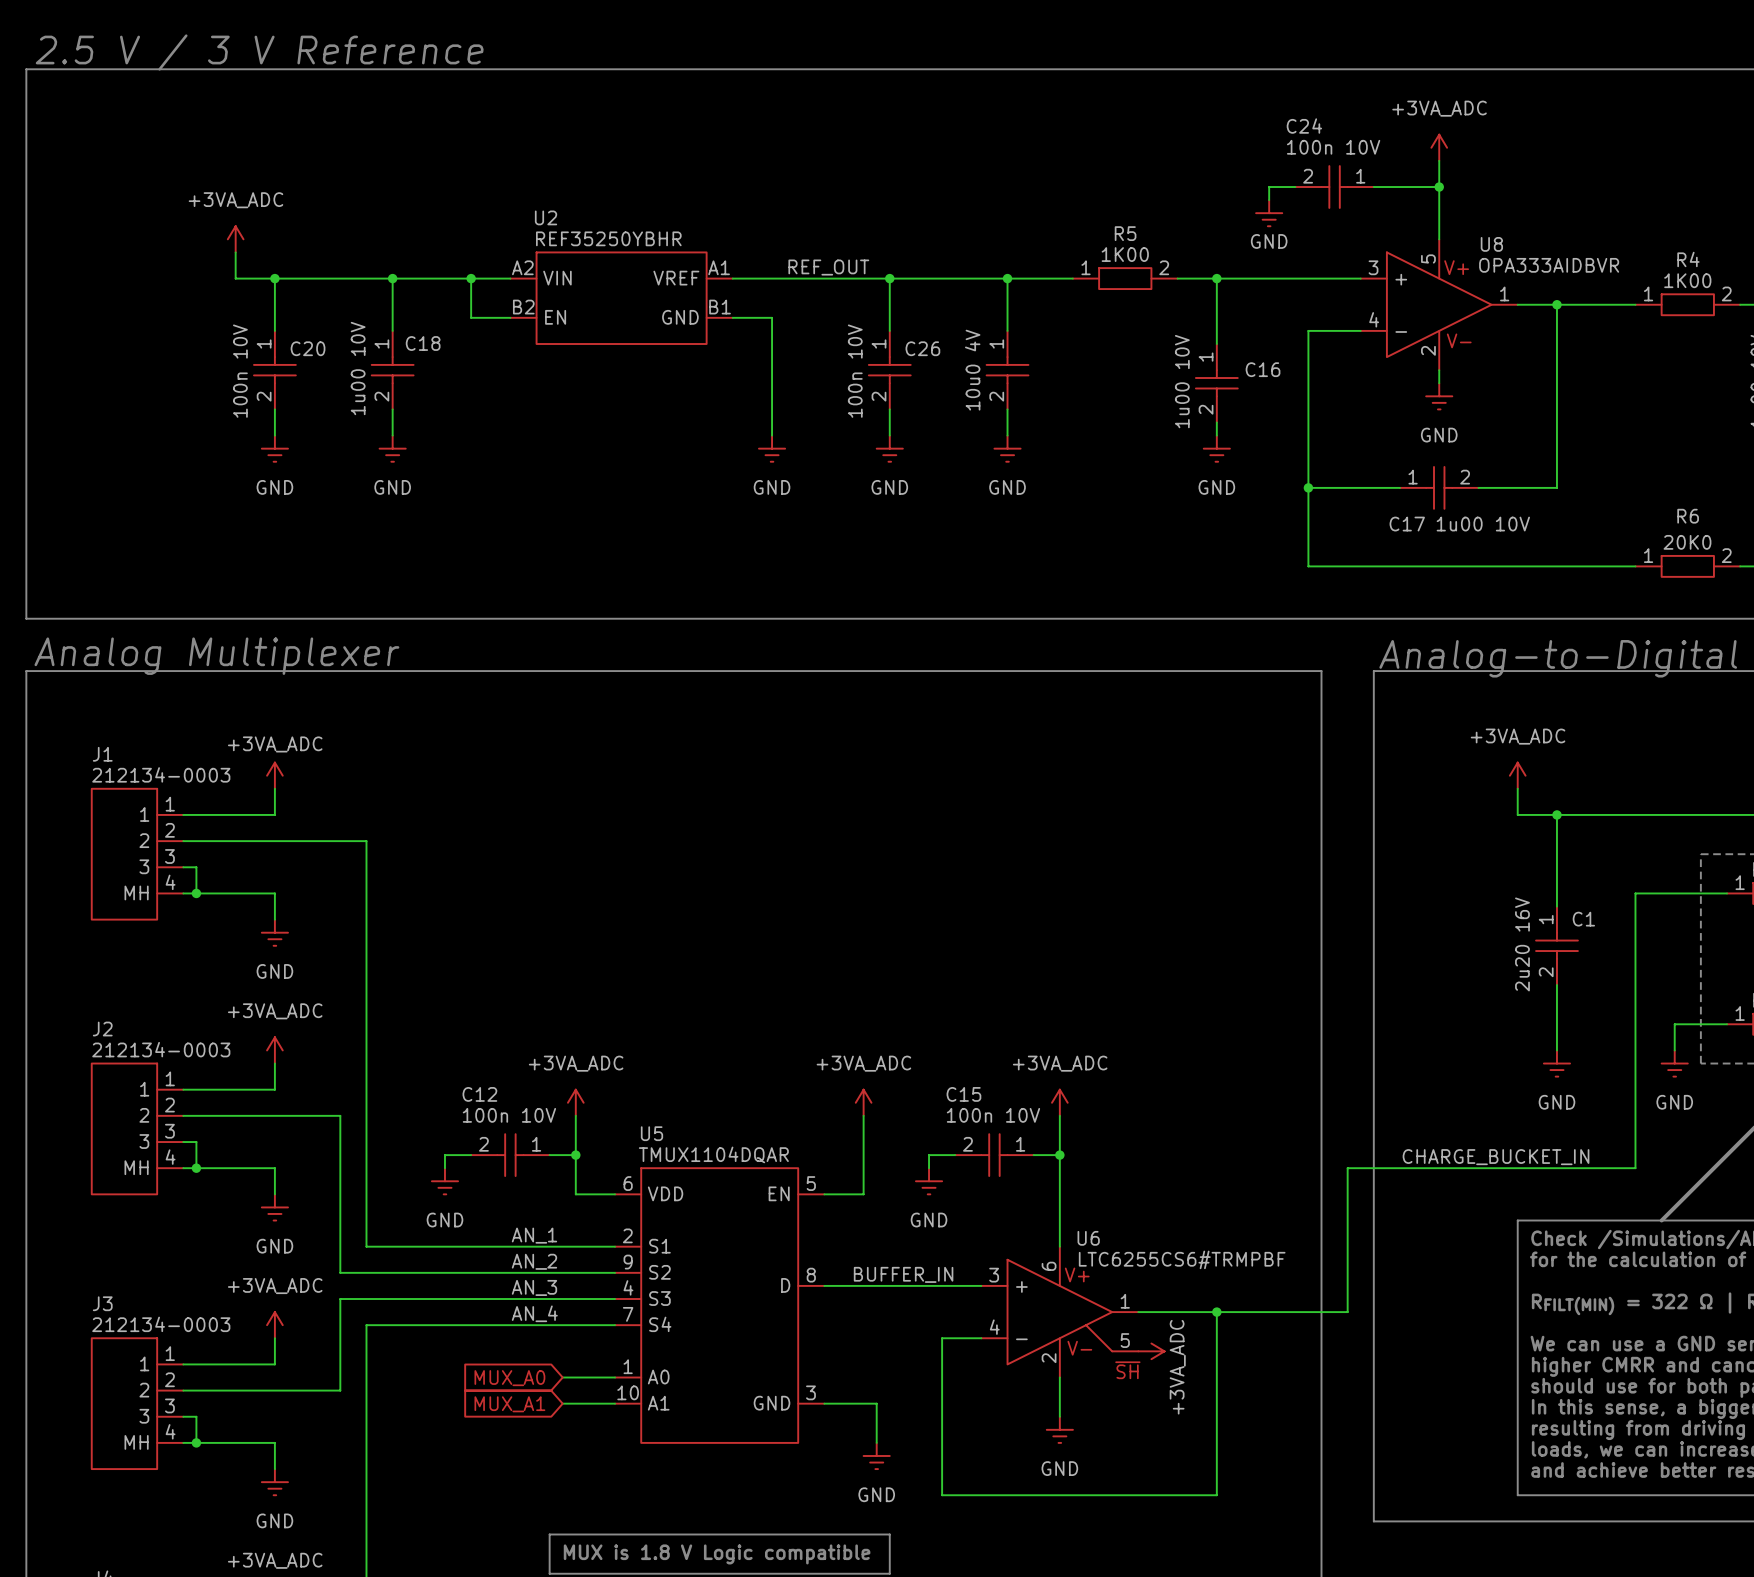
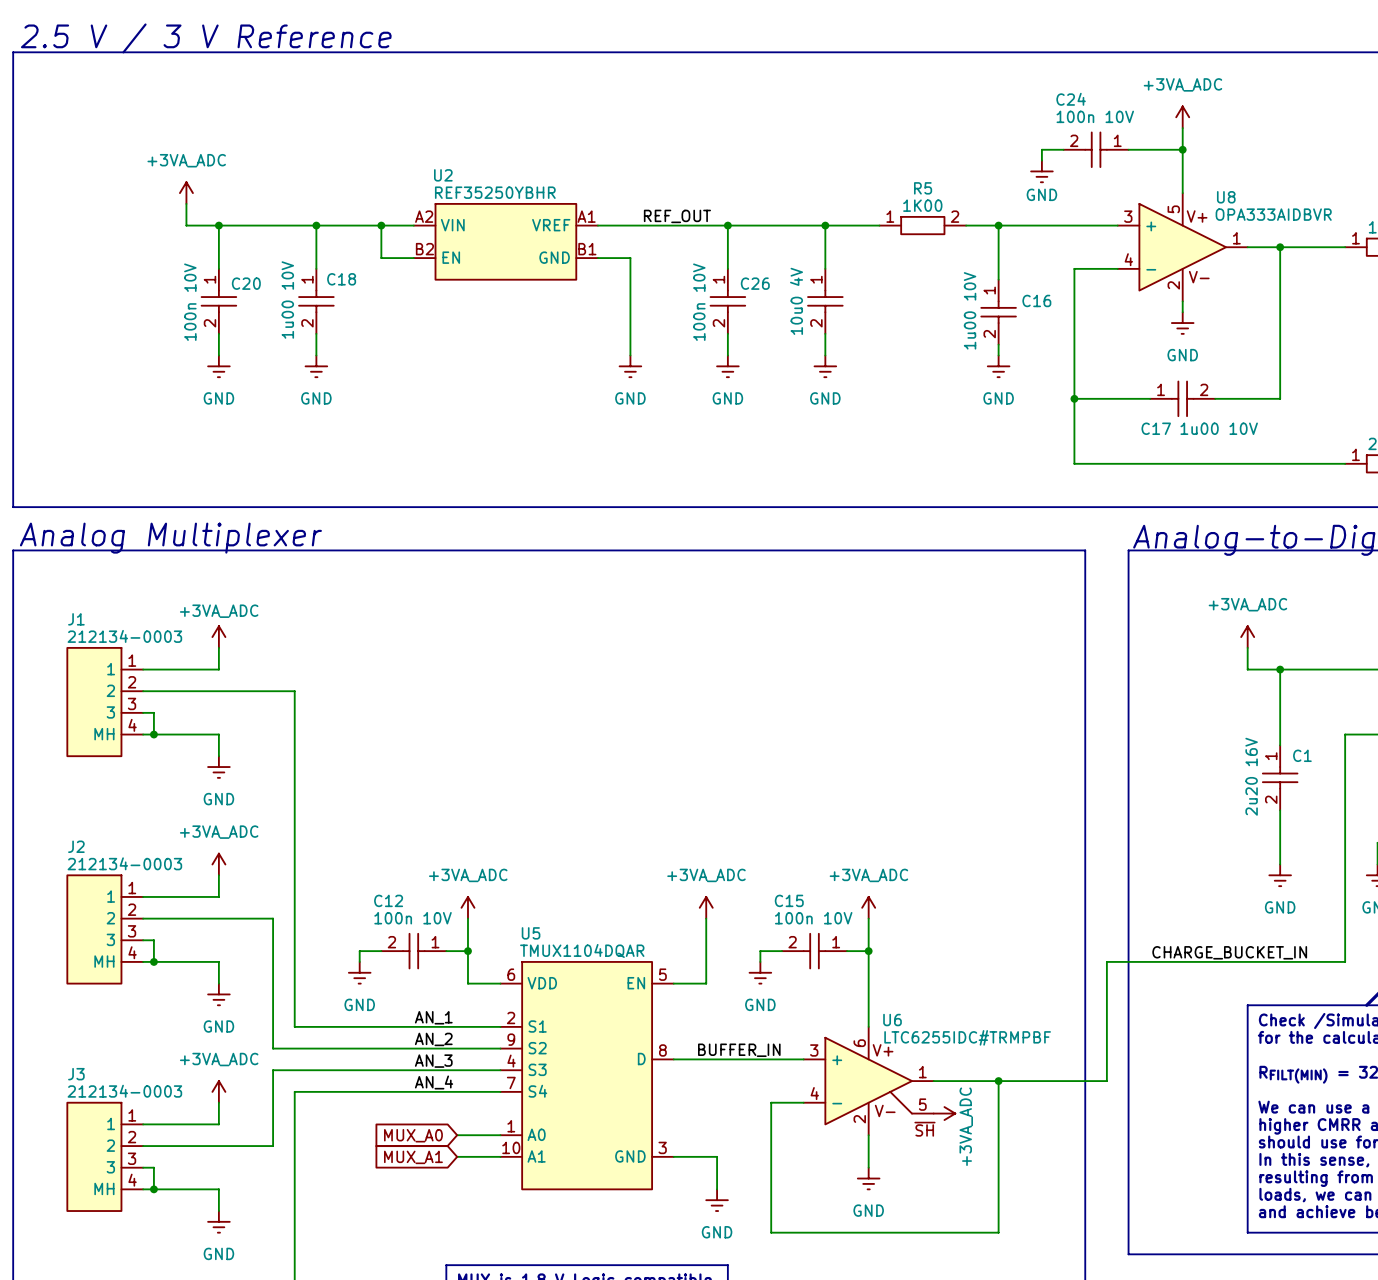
U6 value: LTC6255CS6#TRMPBF (1182, 1259) -> LTC6255IDC#TRMPBF (967, 1037)

